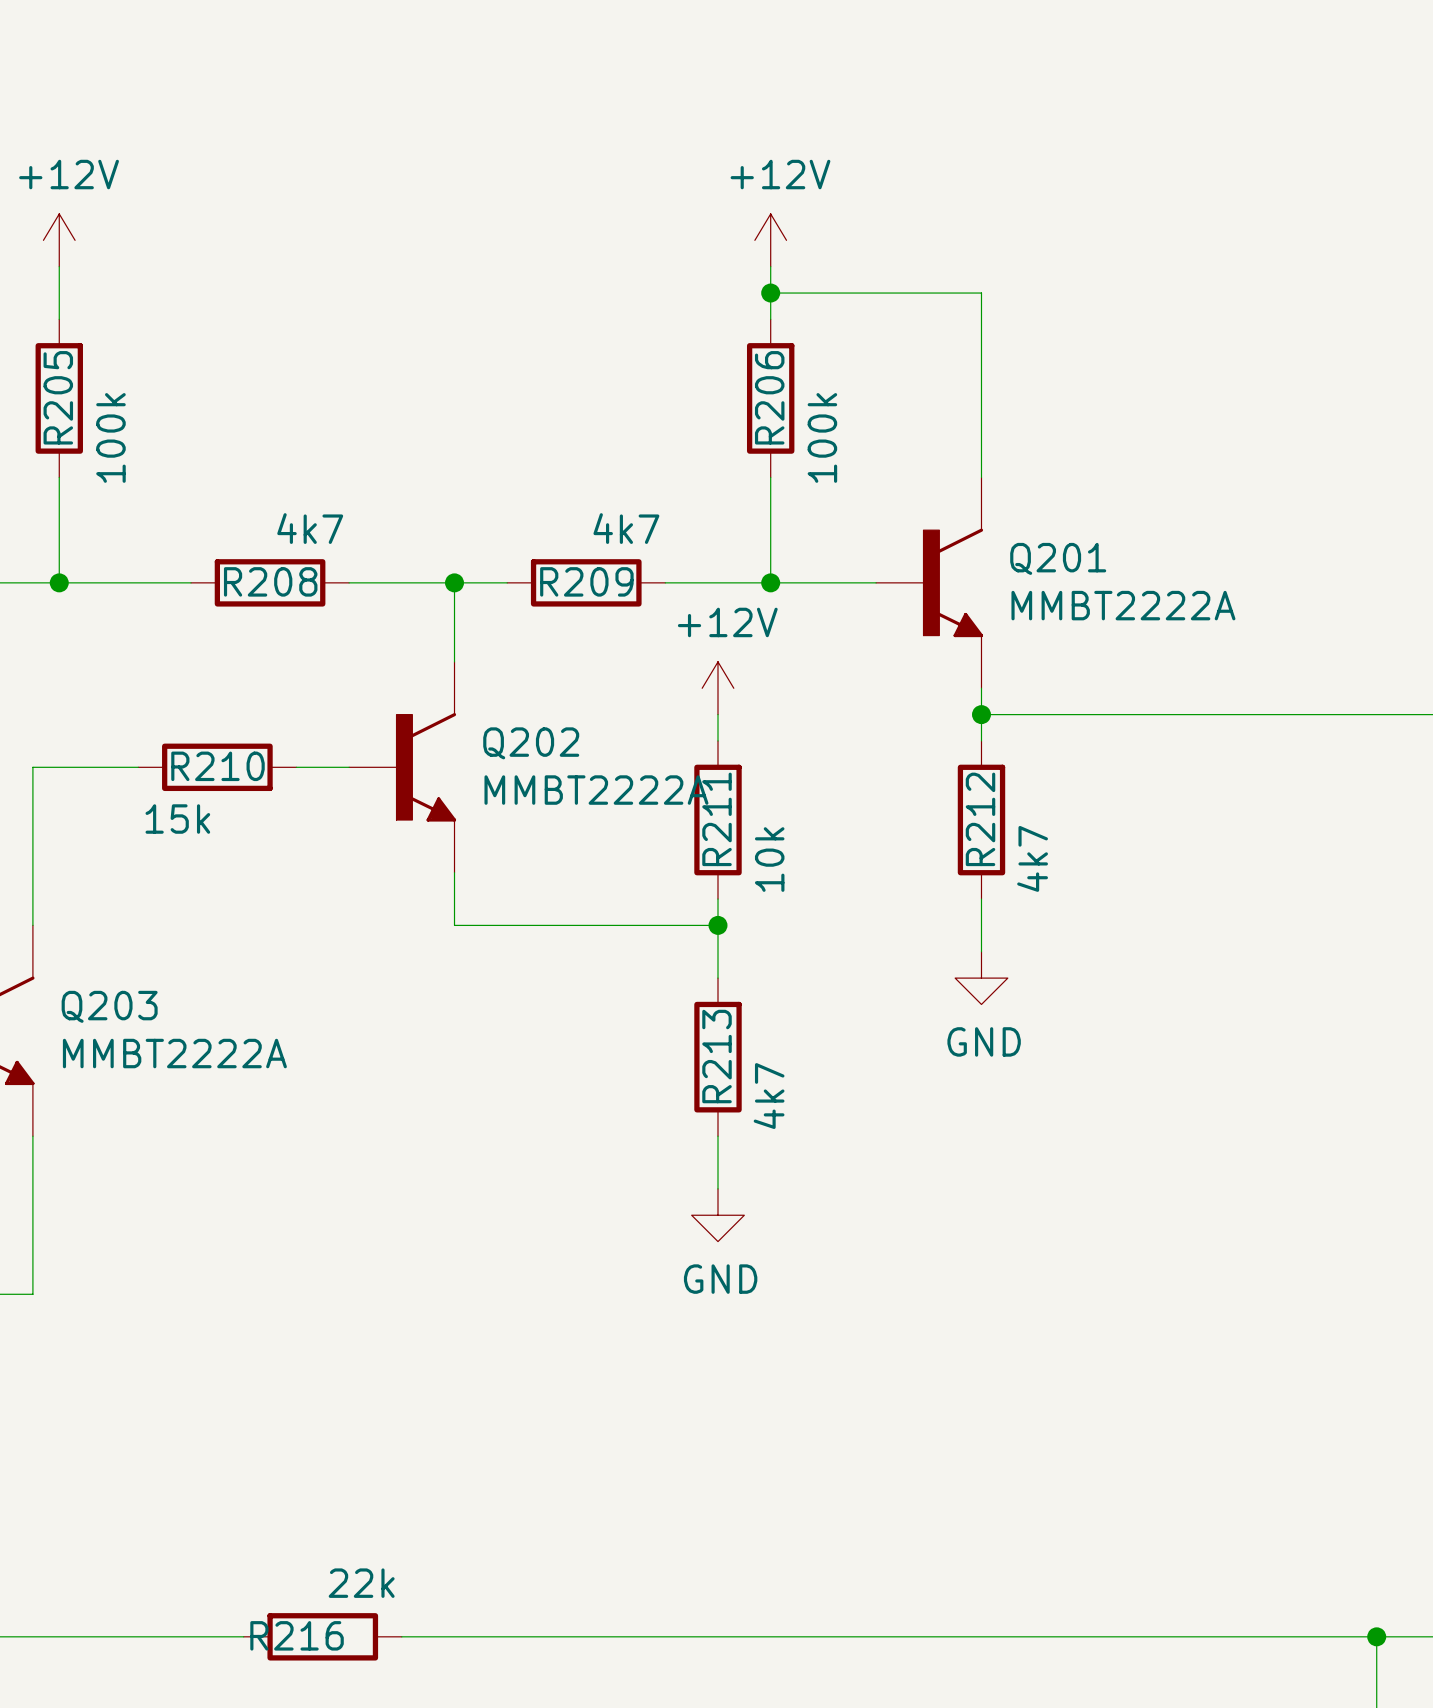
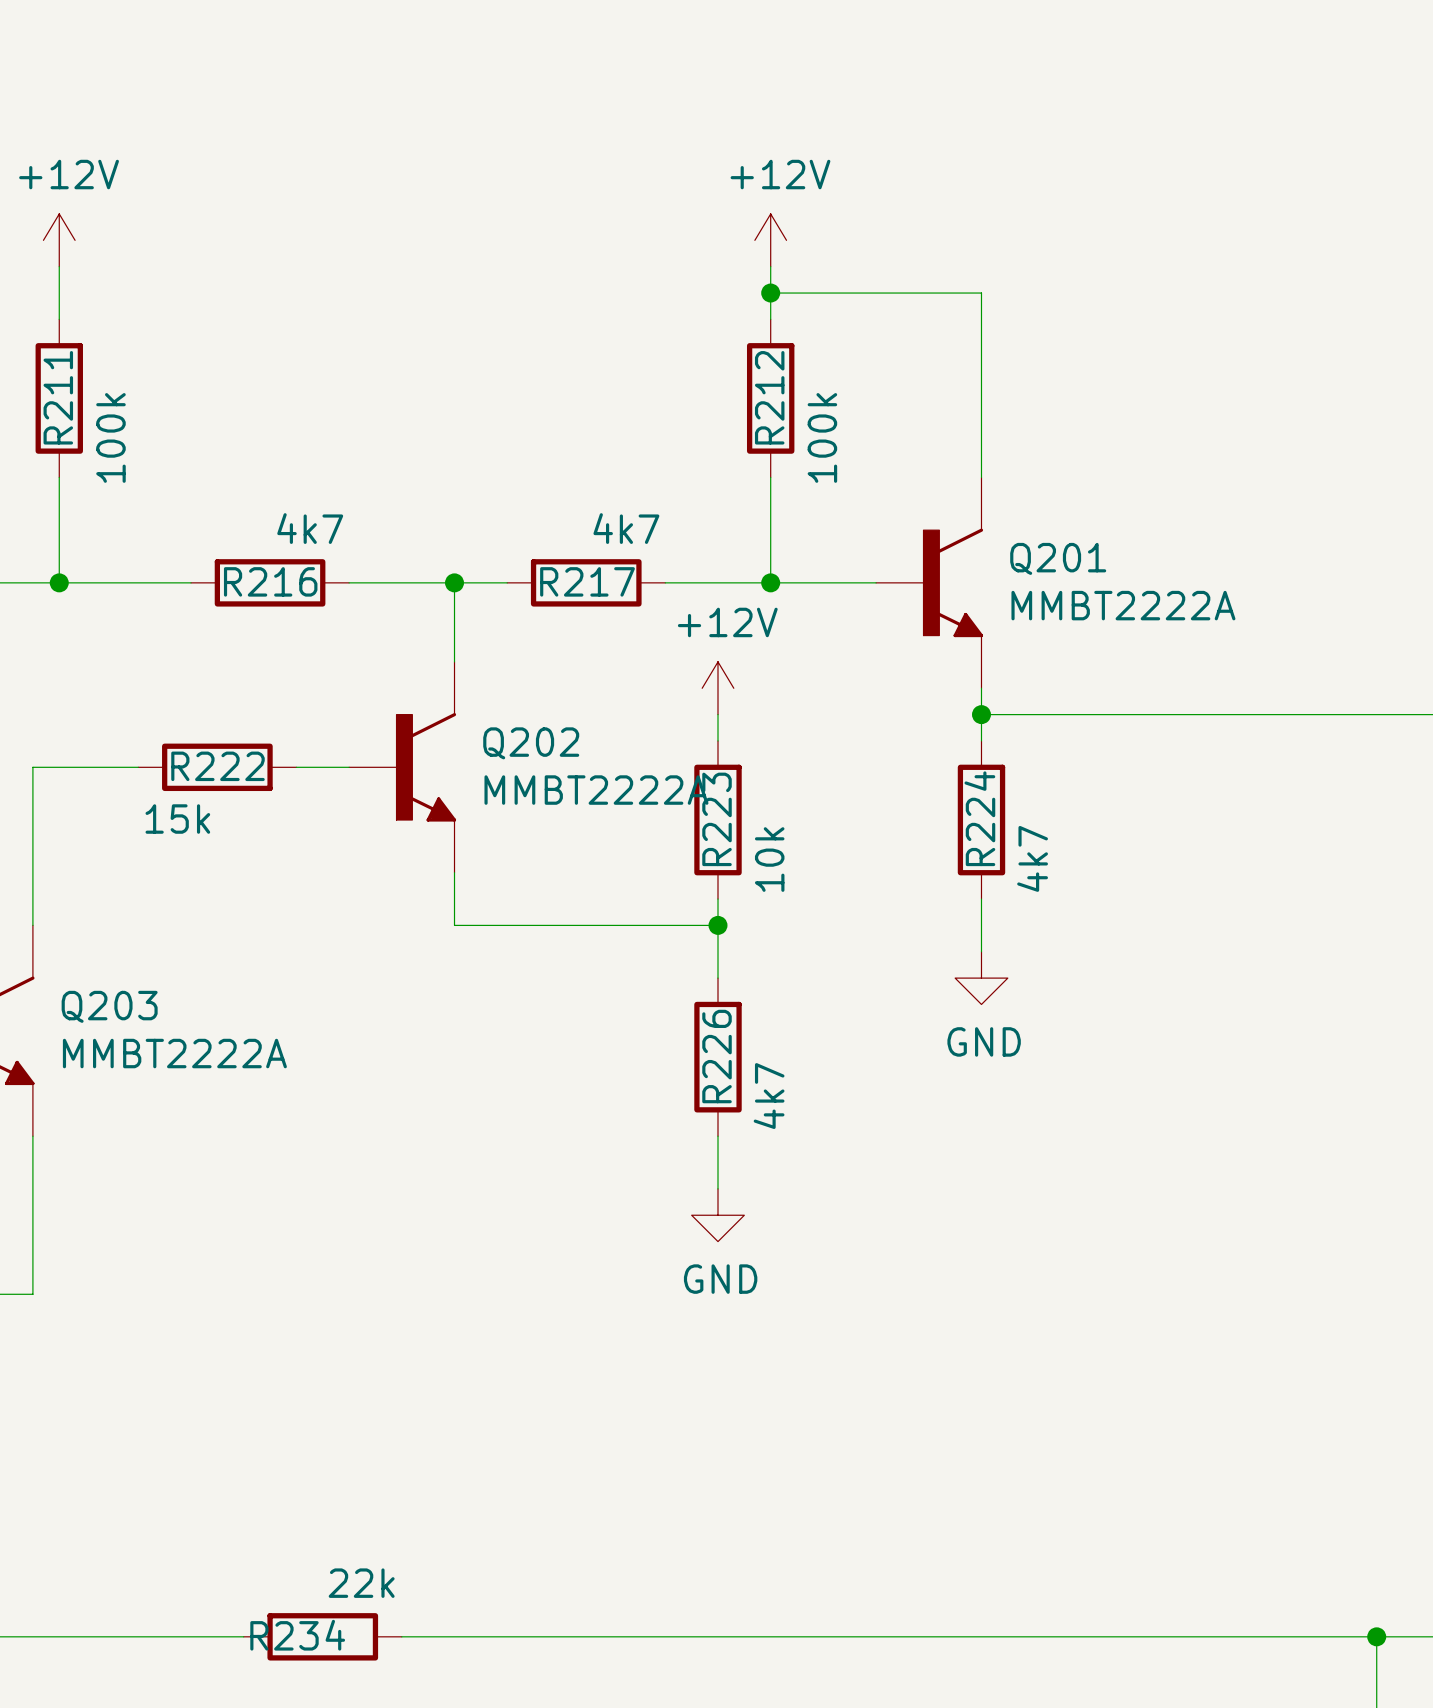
R205 name: R205 (58, 397) -> R211 (58, 397)
R206 name: R206 (769, 397) -> R212 (769, 397)
R208 name: R208 (270, 581) -> R216 (270, 581)
R209 name: R209 (586, 581) -> R217 (587, 581)
R210 name: R210 (217, 766) -> R222 (217, 766)
R211 name: R211 (717, 819) -> R223 (717, 819)
R212 name: R212 (980, 819) -> R224 (979, 818)
R213 name: R213 (717, 1056) -> R226 (717, 1056)
R216 name: R216 (297, 1635) -> R234 (297, 1635)

